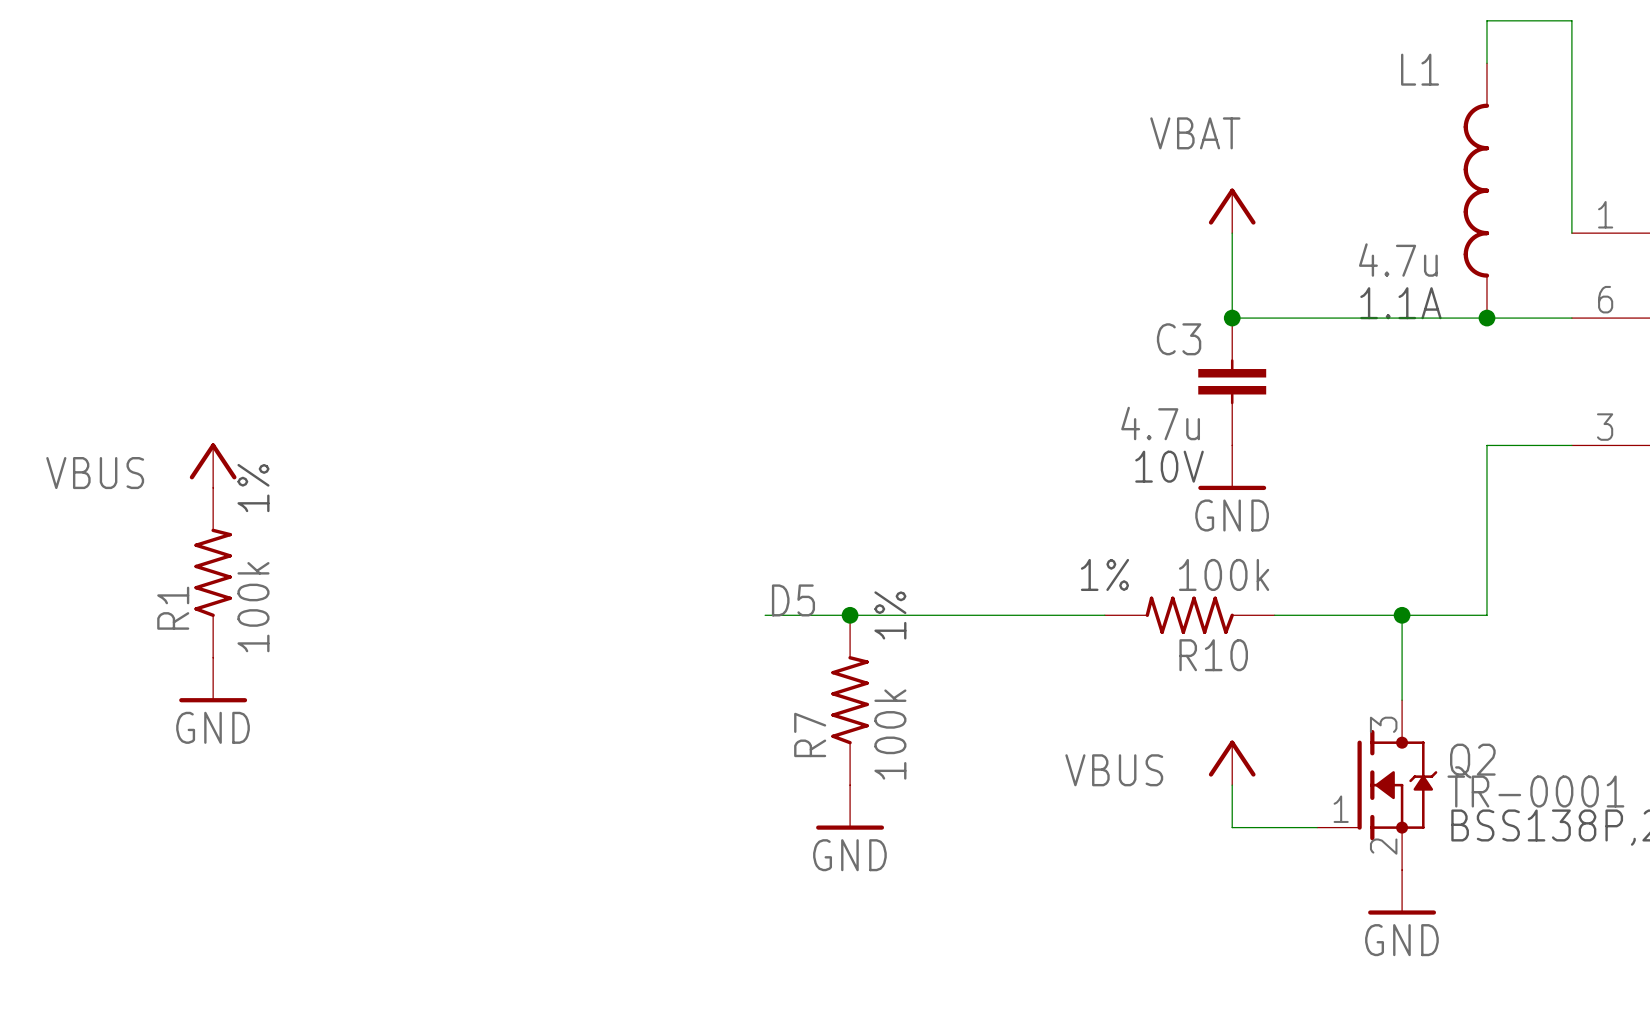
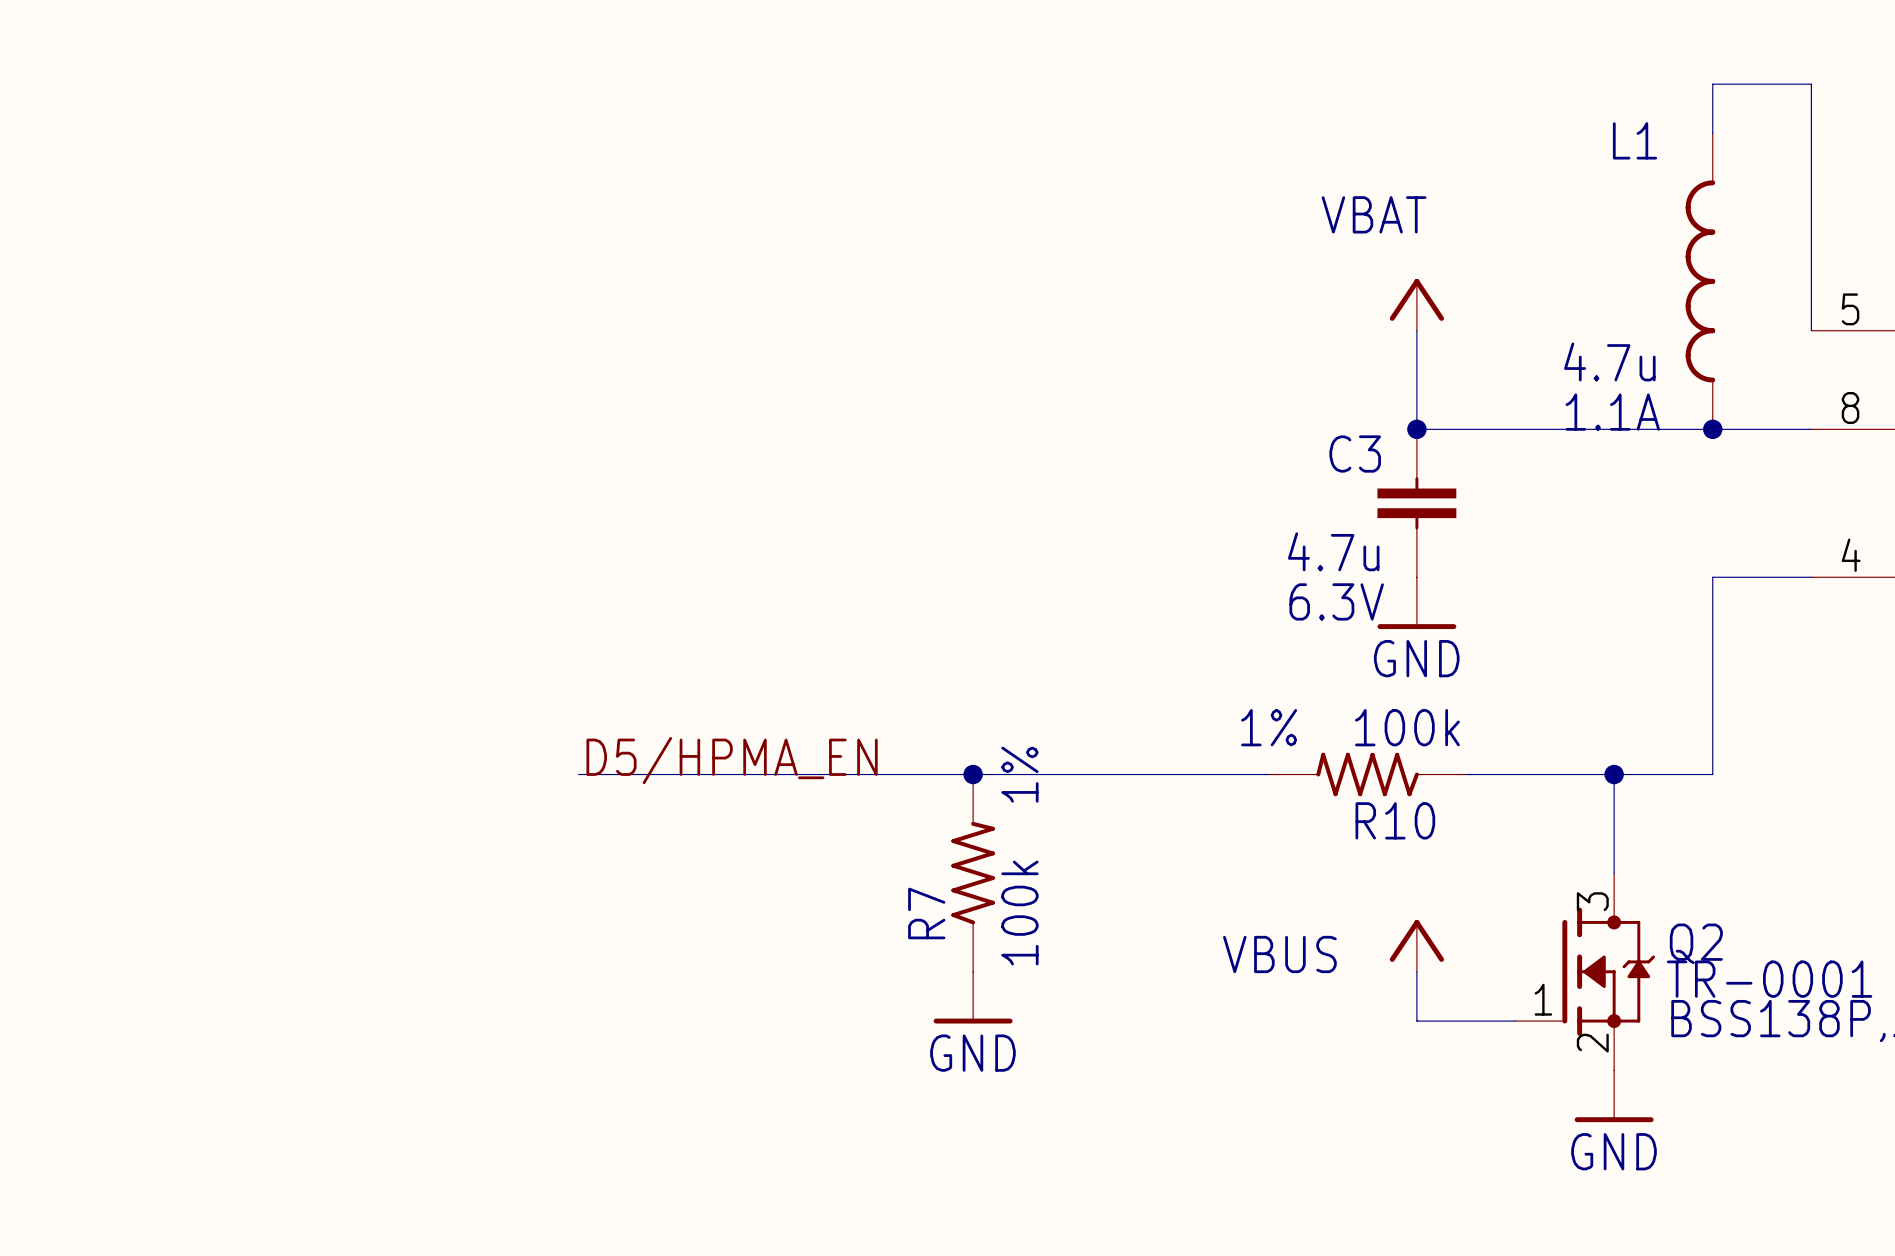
part pin number: 1 (1605, 214) -> 5 (1850, 309)
part pin number: 6 (1605, 299) -> 8 (1850, 407)
part pin number: 3 (1605, 427) -> 4 (1851, 555)
power symbol: VBUS (213, 465) -> none
C3 text: 10V (1169, 466) -> 6.3V (1336, 601)
R1: 100k (213, 572) -> none
label: D5 (793, 600) -> none
label: none -> D5/HPMA_EN (732, 760)
wire: none -> (578, 774) (874, 774)
power symbol: GND (213, 680) -> none

